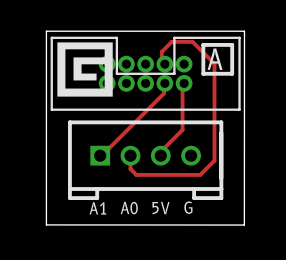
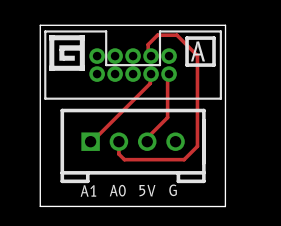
drawing: none -> [49, 35, 85, 71]
drawing: [57, 42, 113, 97] -> none

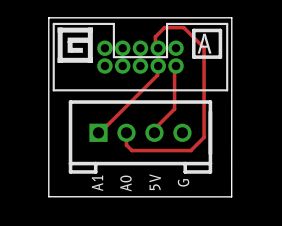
text rotation: 0° (88, 190) -> 90° counterclockwise (97, 183)
text rotation: 0° (117, 190) -> 90° counterclockwise (125, 183)
text rotation: 0° (147, 190) -> 90° counterclockwise (155, 182)
text rotation: 0° (173, 190) -> 90° counterclockwise (183, 182)

